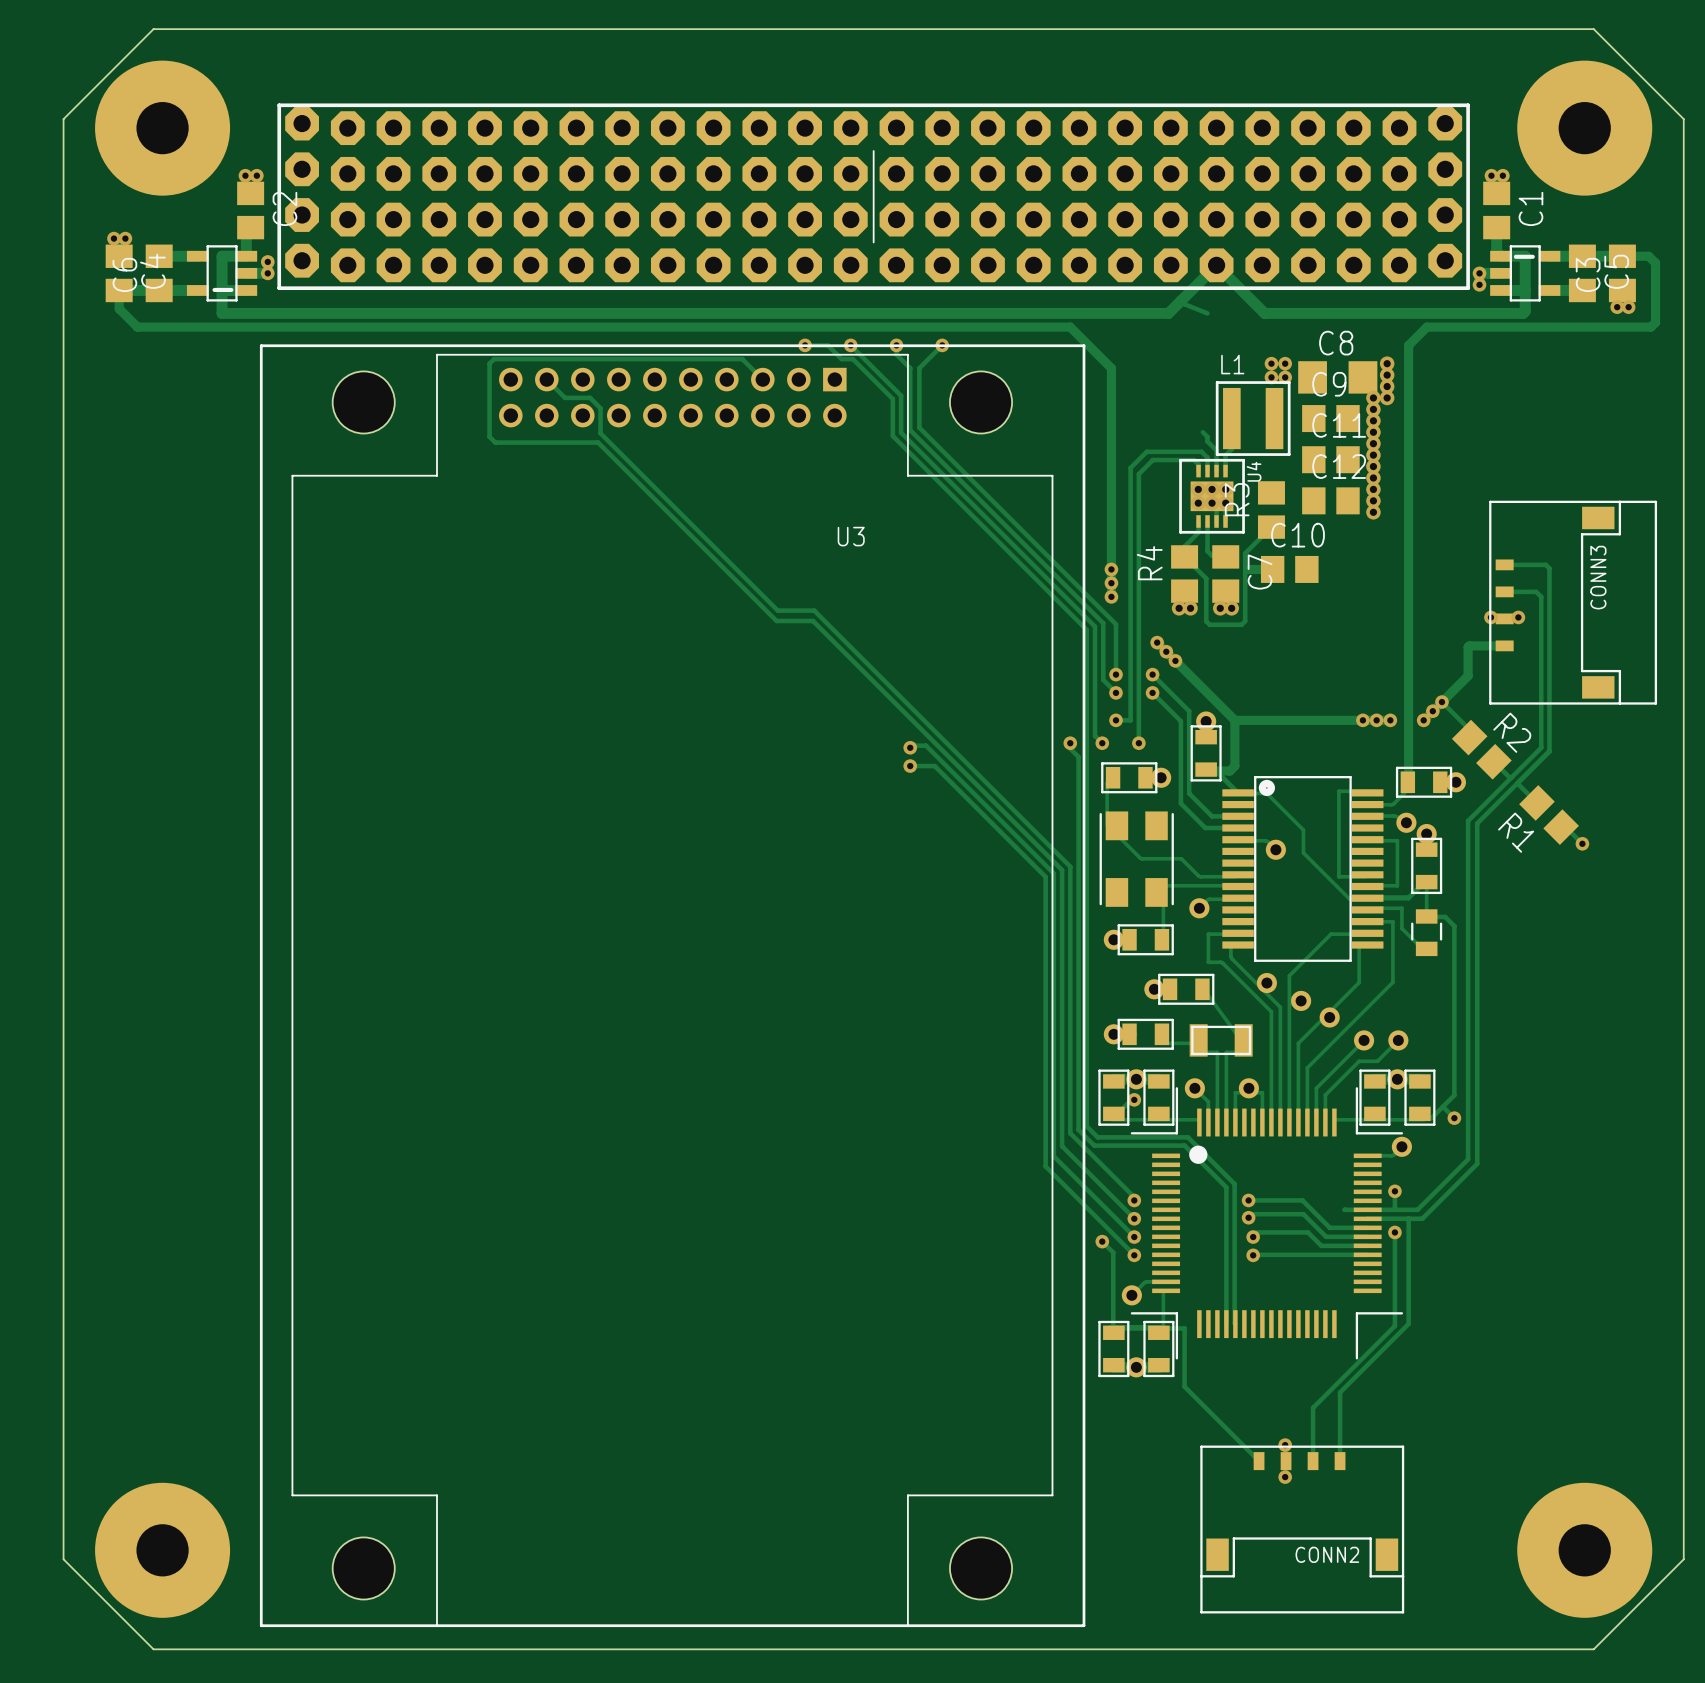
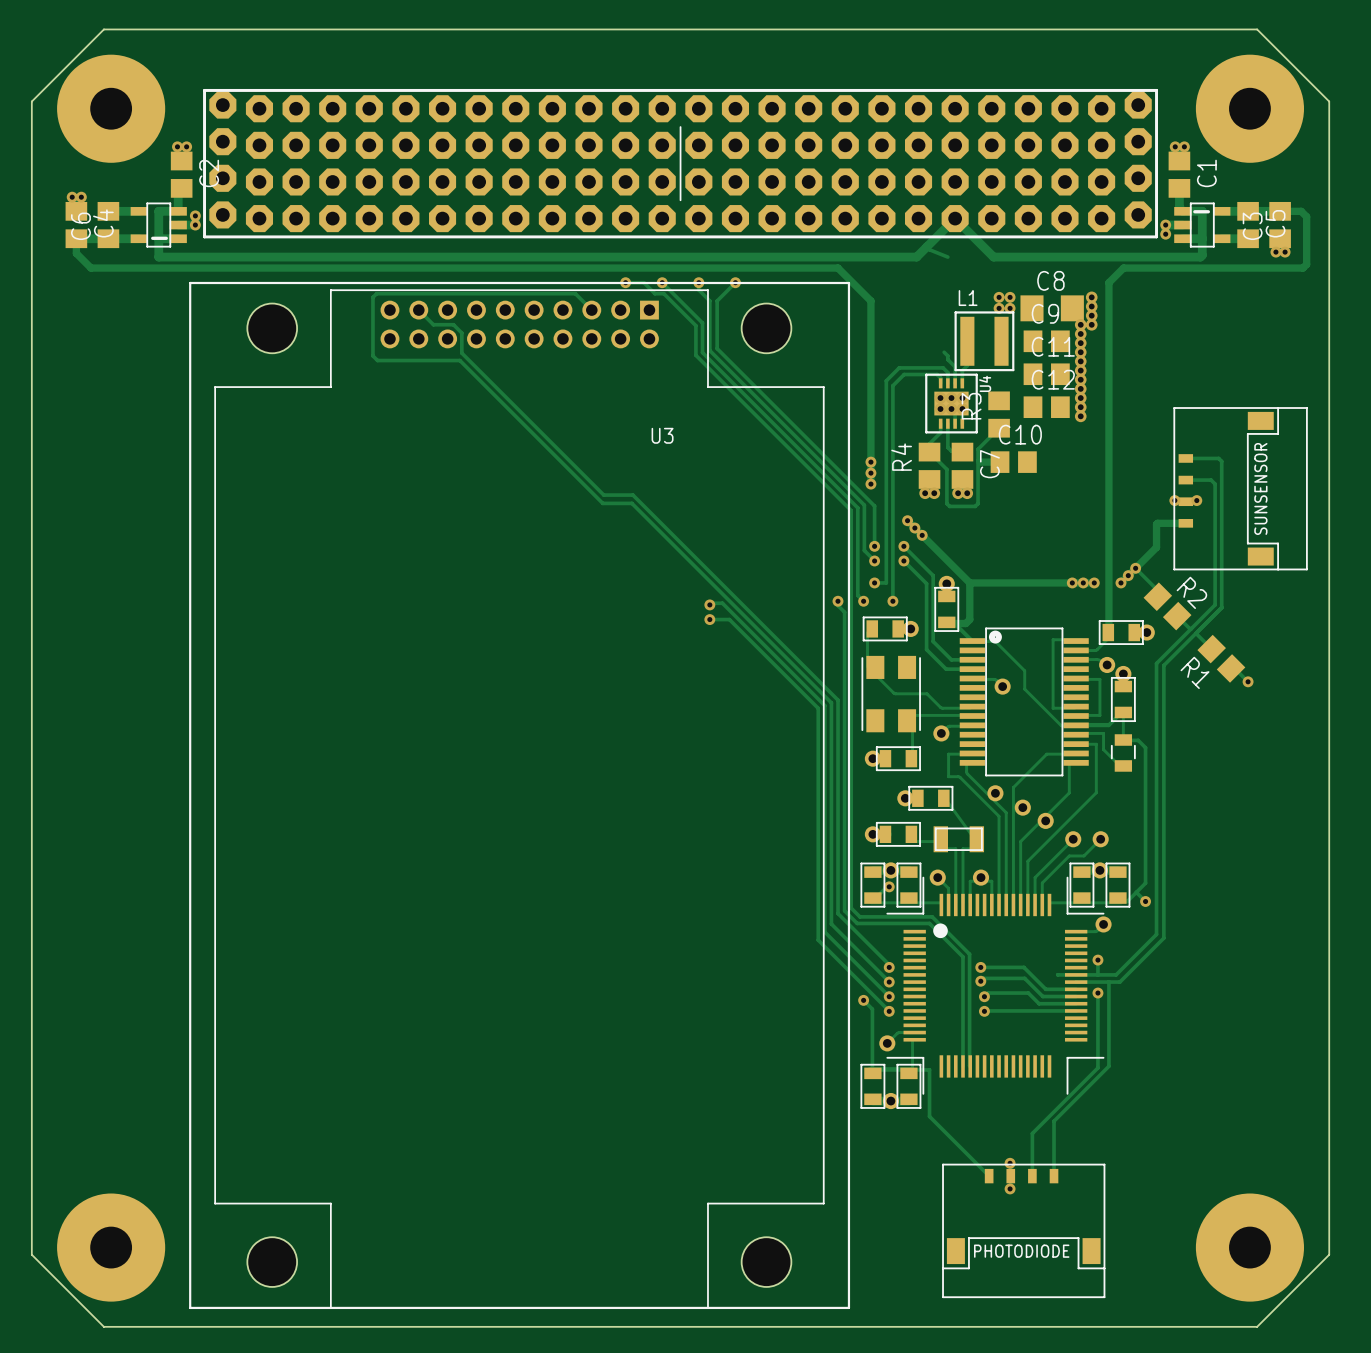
CONN3 name: CONN3 (1598, 577) -> SUNSENSOR (1260, 488)
CONN2 name: CONN2 (1327, 1554) -> PHOTODIODE (1021, 1251)

